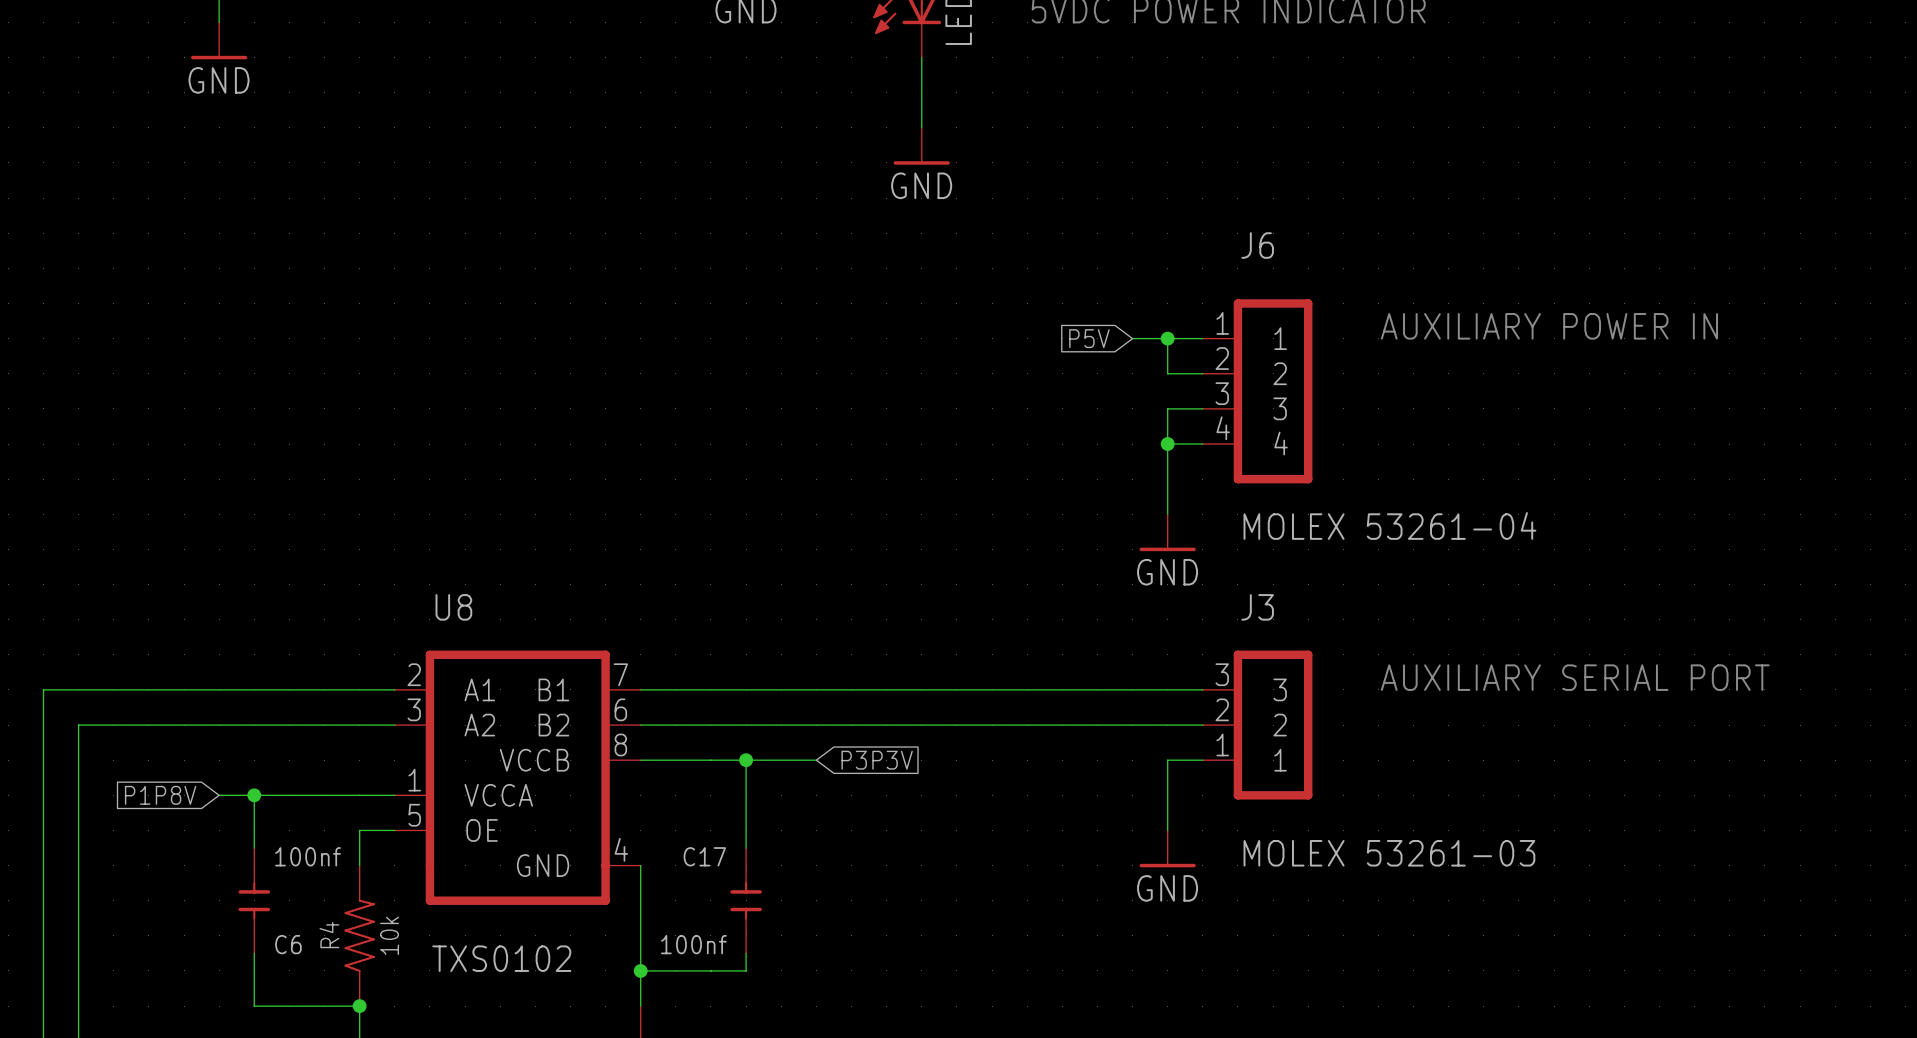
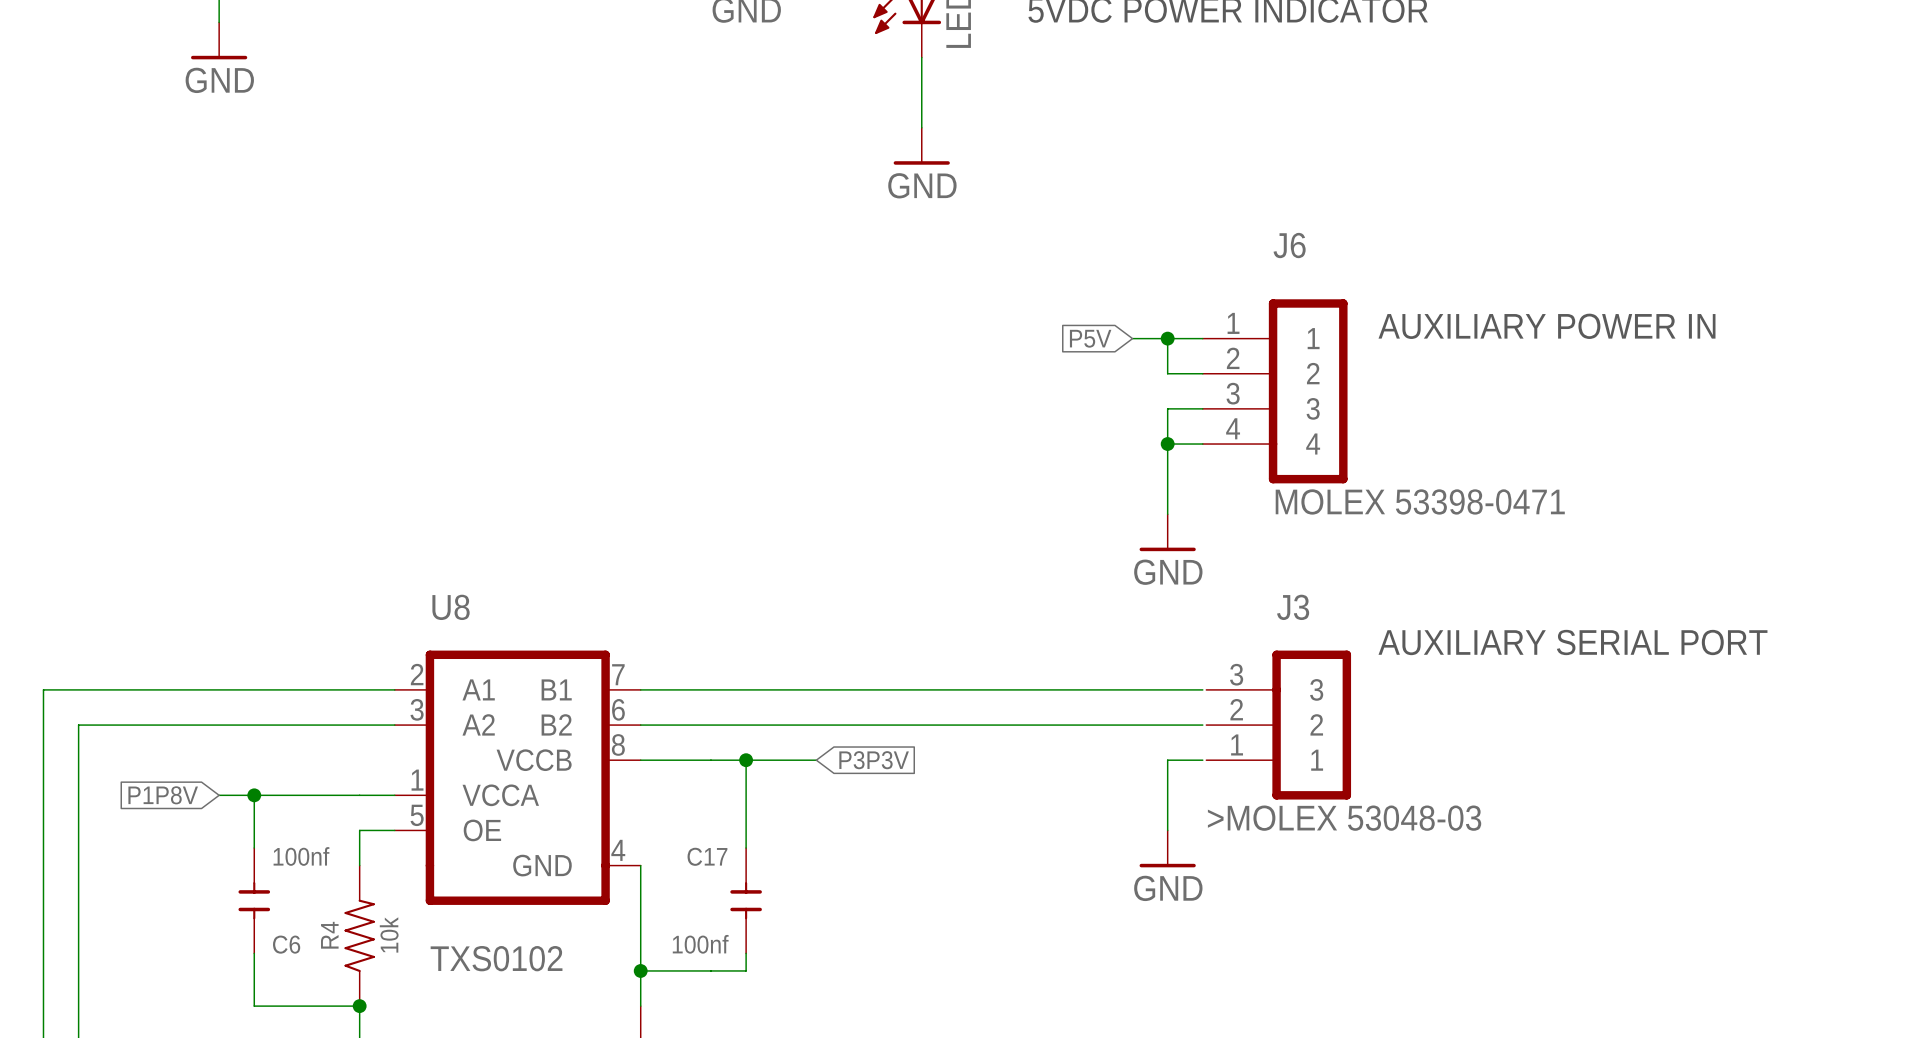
J6 symbol: [1202, 299, 1313, 484] -> [1202, 299, 1348, 484]
text: none -> MOLEX 53398-0471 (1420, 501)
J6 value: MOLEX 53261-04 (1389, 525) -> none
J3 symbol: [1202, 650, 1313, 800] -> [1206, 650, 1352, 800]
text position: AUXILIARY SERIAL PORT (1575, 677) -> AUXILIARY SERIAL PORT (1572, 642)
J3 value: MOLEX 53261-03 (1389, 853) -> none

